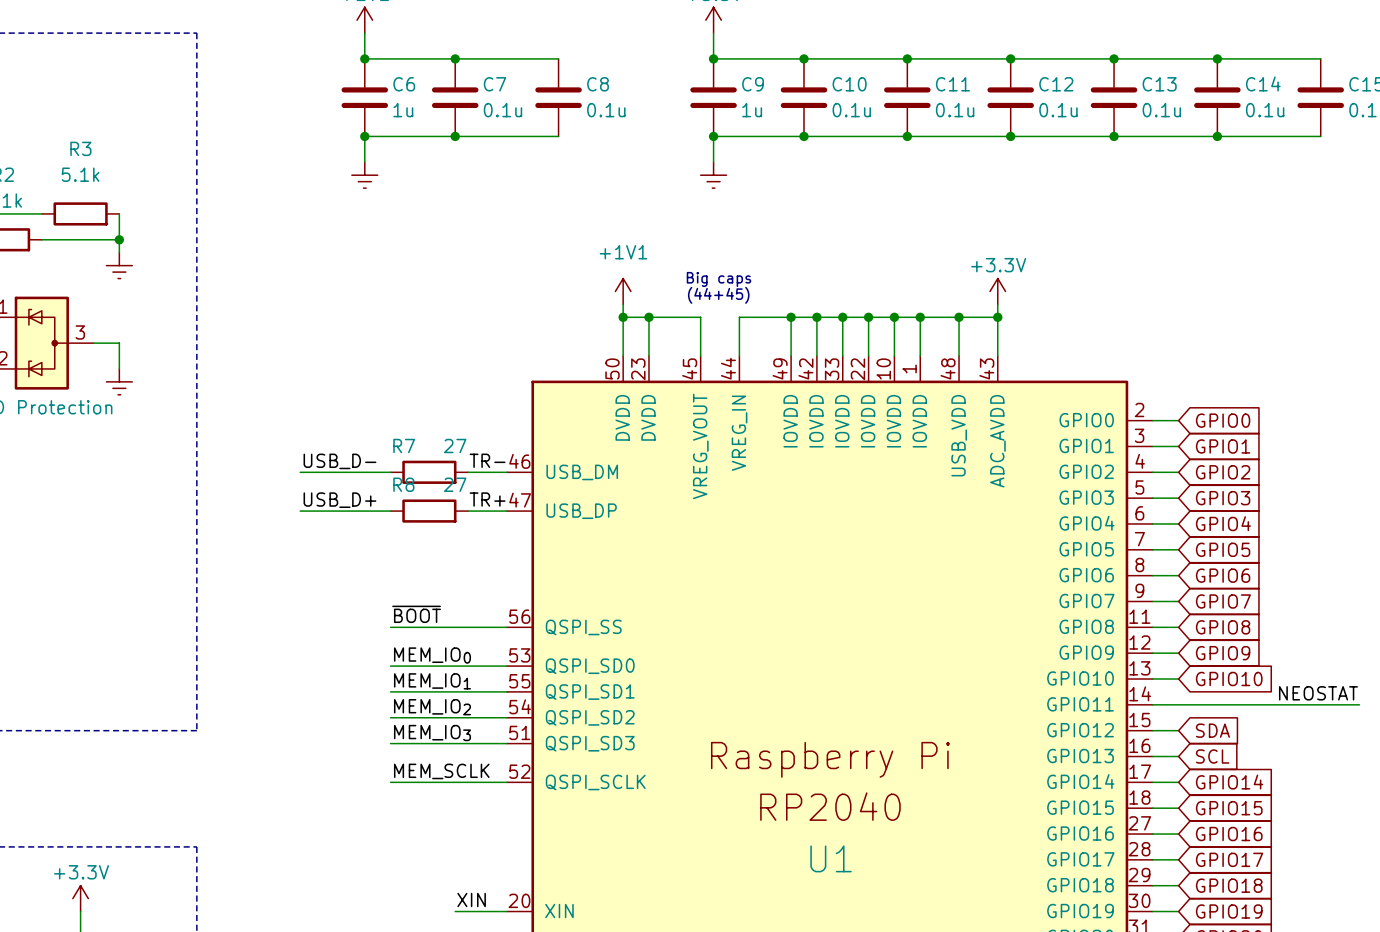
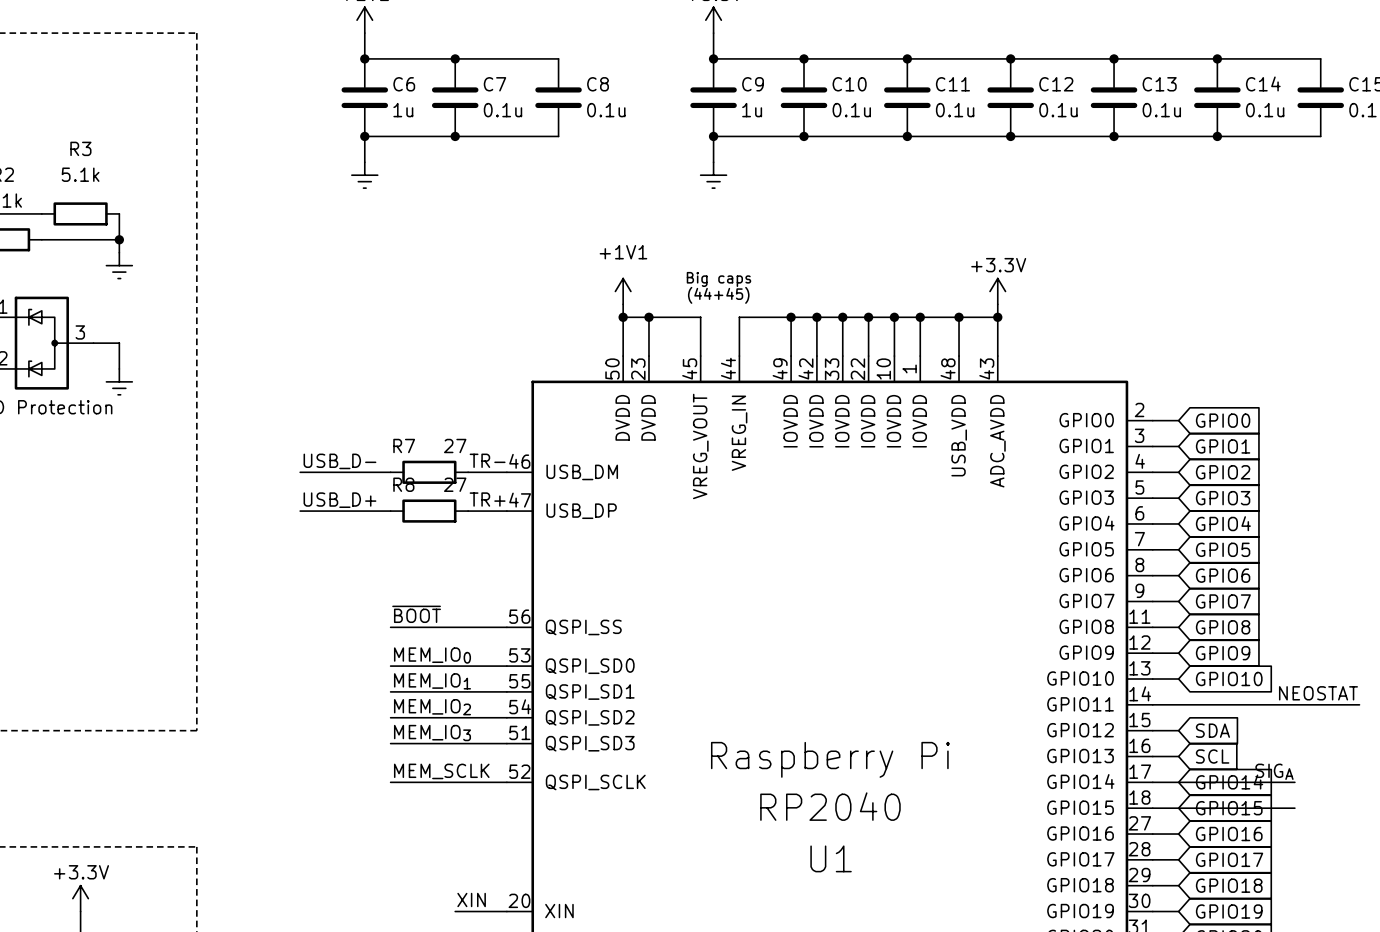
label: none -> SIGA (1274, 771)
wire: none -> (1178, 782) (1294, 782)
wire: none -> (1178, 808) (1294, 808)

